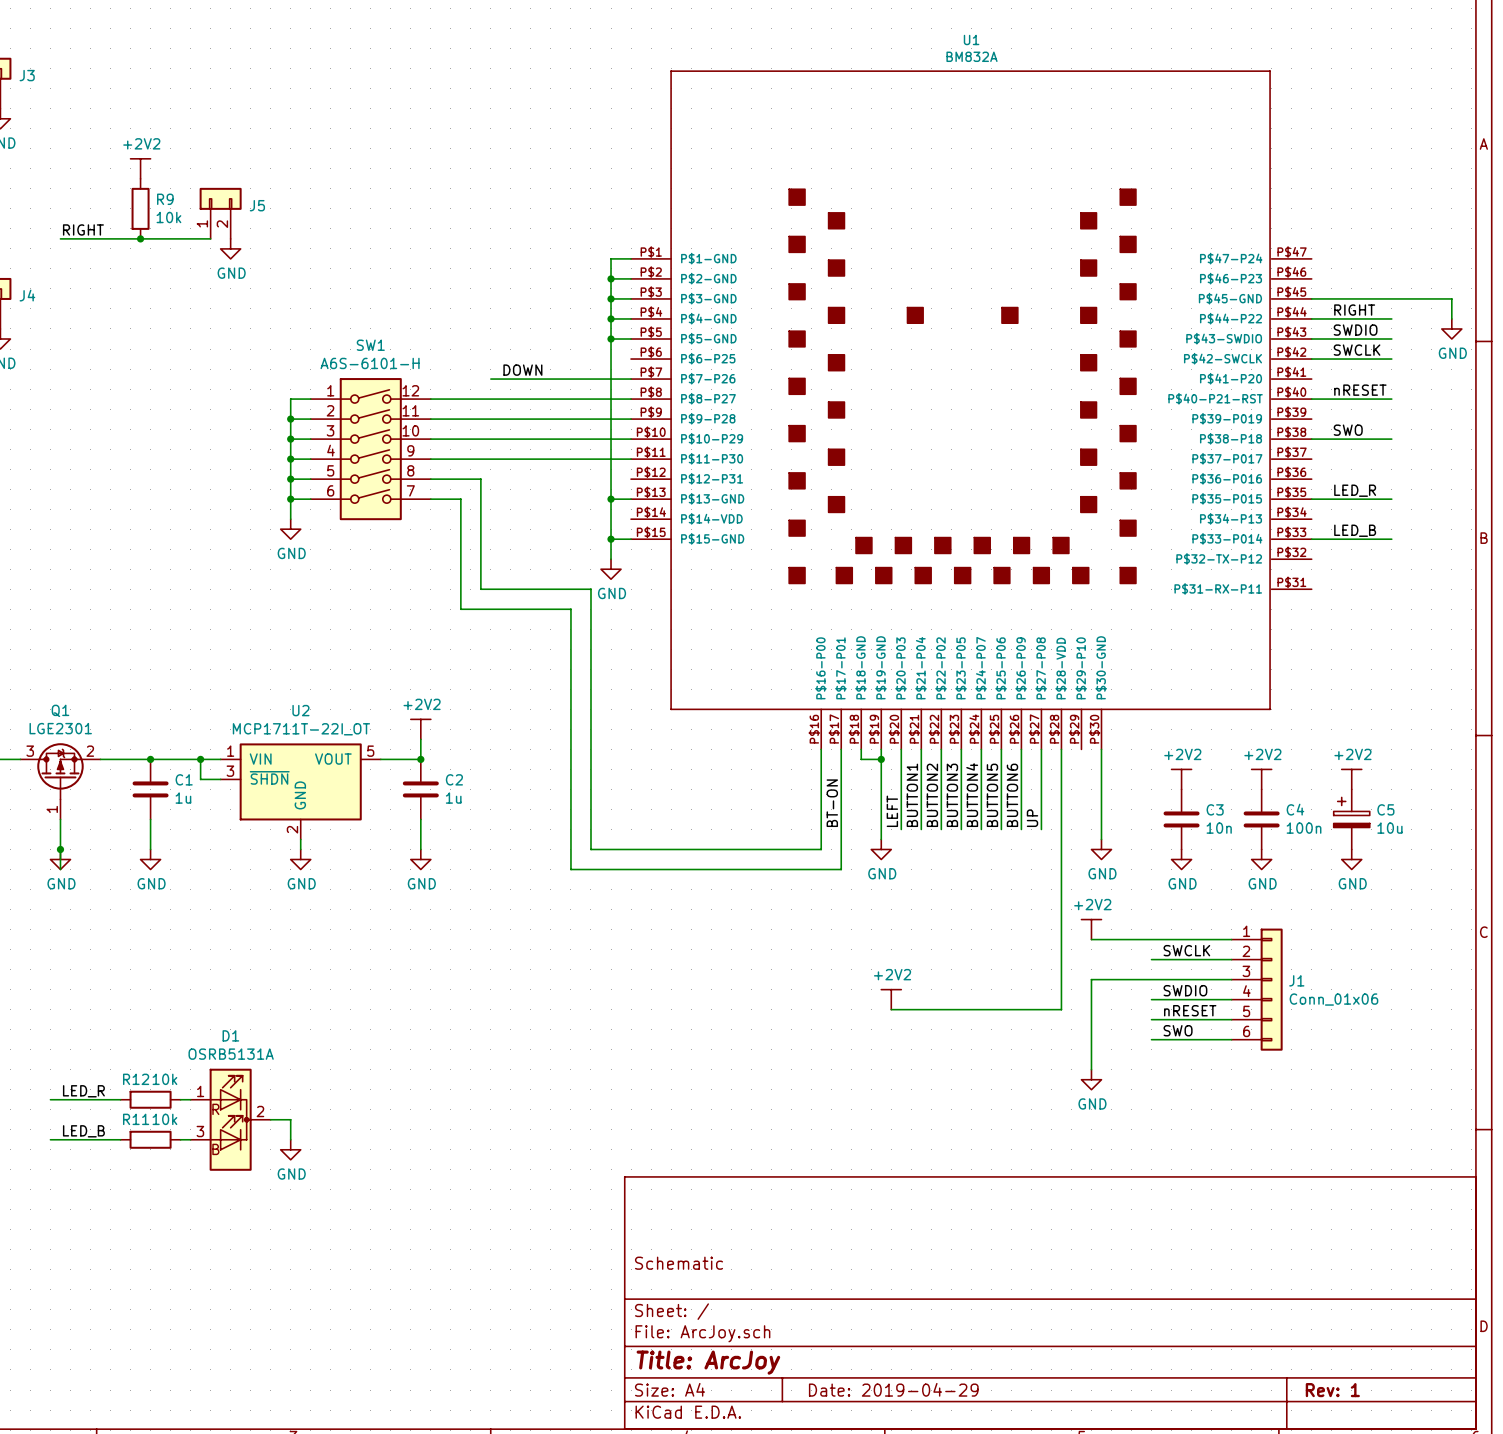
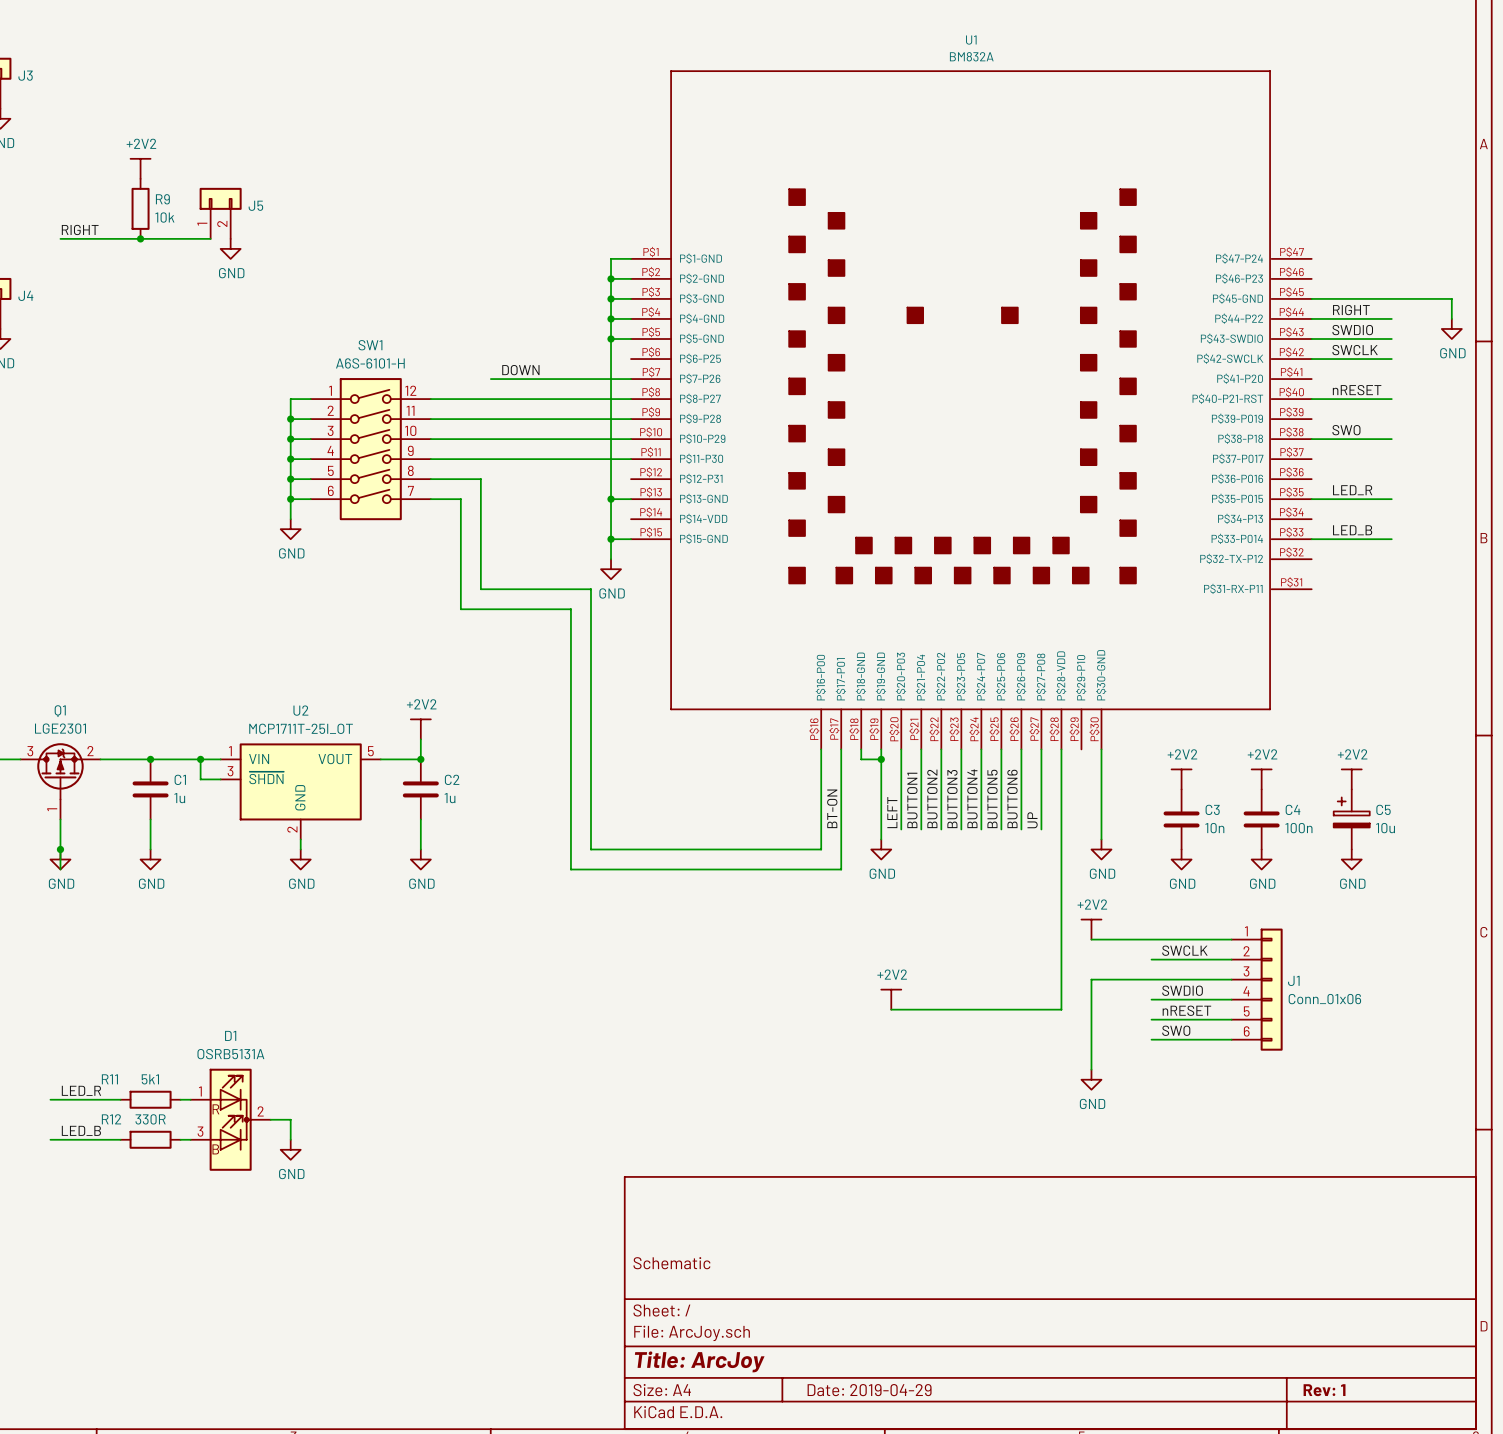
U2 value: MCP1711T-22I_OT (301, 729) -> MCP1711T-25I_OT (301, 728)
R12 name position: R12 (136, 1079) -> R12 (111, 1119)
R11 text: none -> 5k1 (150, 1079)
R11 value: 10k (164, 1079) -> none
R11 name position: R11 (136, 1119) -> R11 (109, 1079)
R12 text: none -> 330R (150, 1119)
R12 value: 10k (164, 1119) -> none

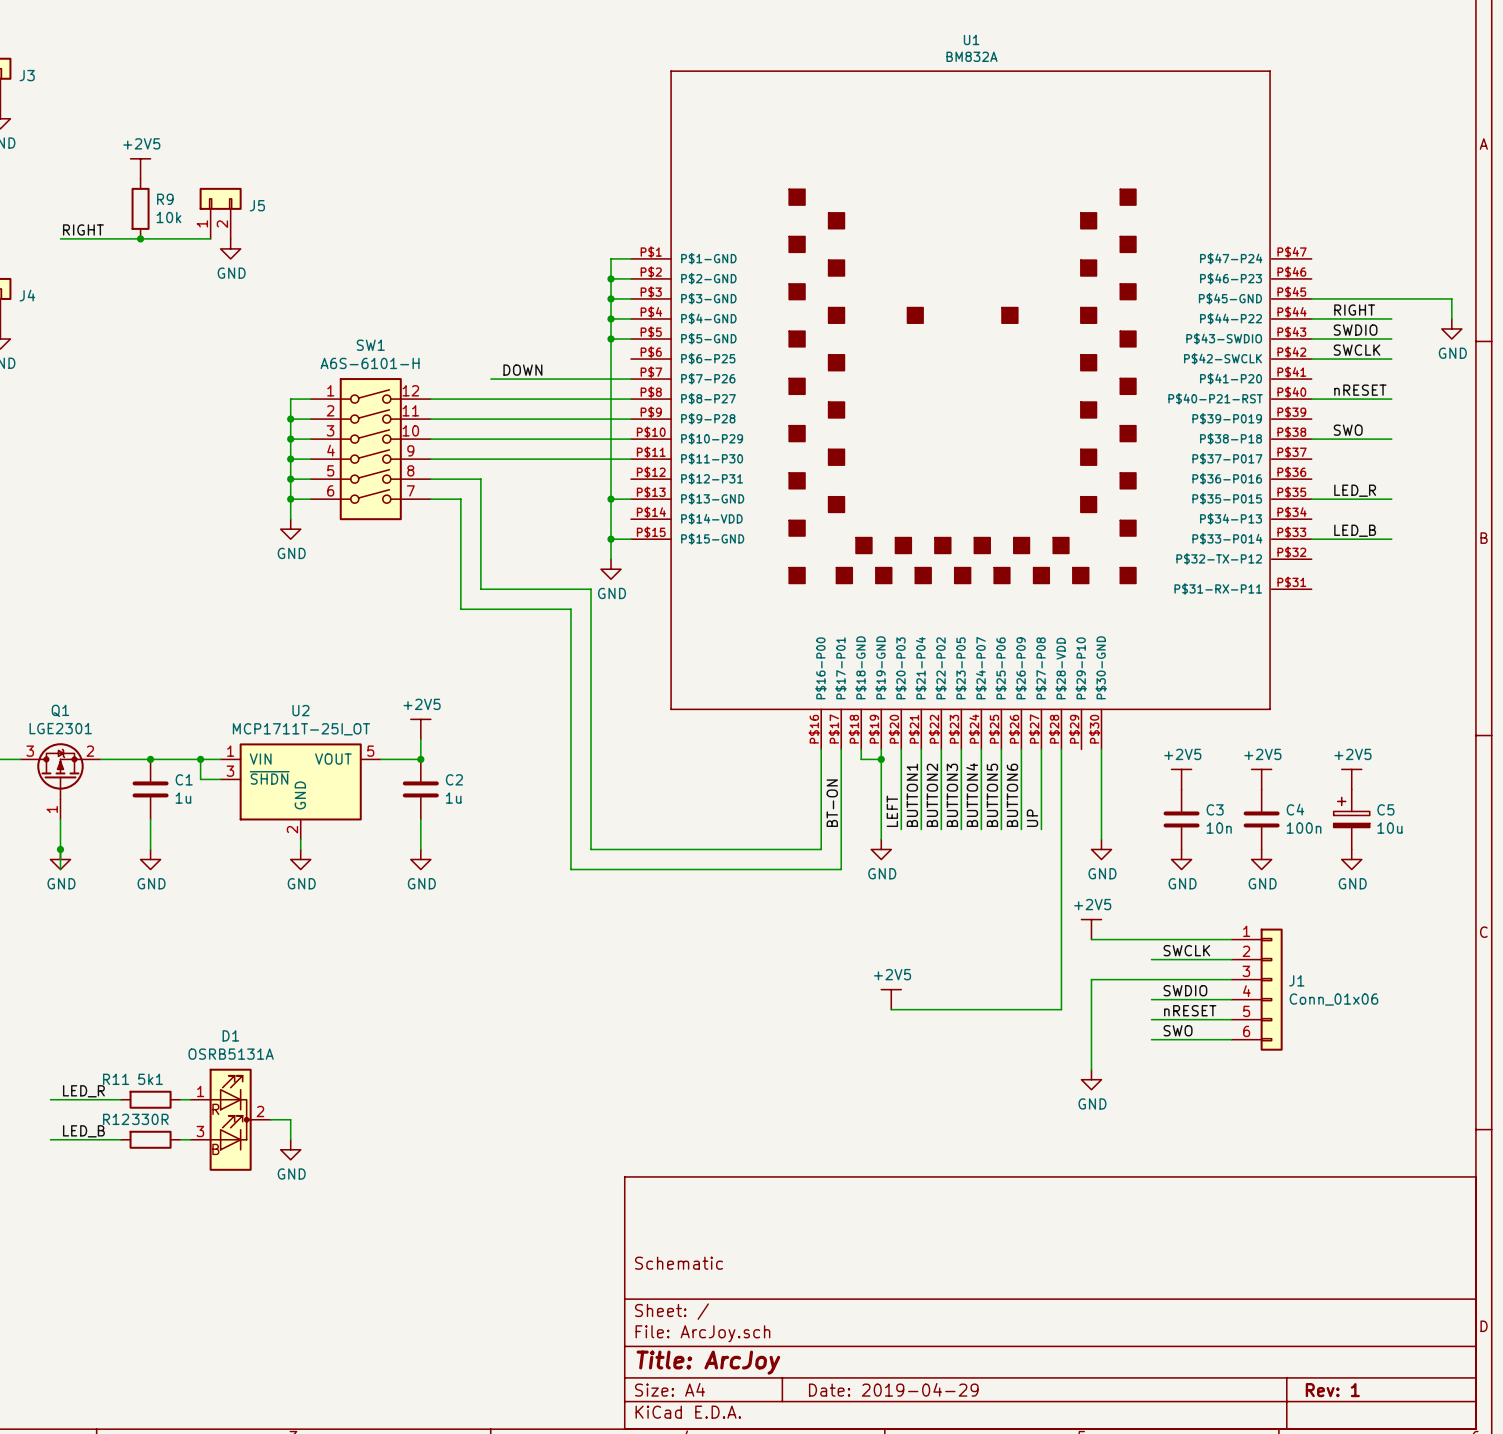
power symbol: +2V2 (140, 168) -> +2V5 (140, 168)
power symbol: +2V2 (420, 729) -> +2V5 (420, 729)
power symbol: +2V2 (1181, 779) -> +2V5 (1181, 779)
power symbol: +2V2 (1261, 779) -> +2V5 (1261, 779)
power symbol: +2V2 (1351, 779) -> +2V5 (1351, 779)
power symbol: +2V2 (1091, 929) -> +2V5 (1091, 929)
power symbol: +2V2 (891, 999) -> +2V5 (891, 999)

